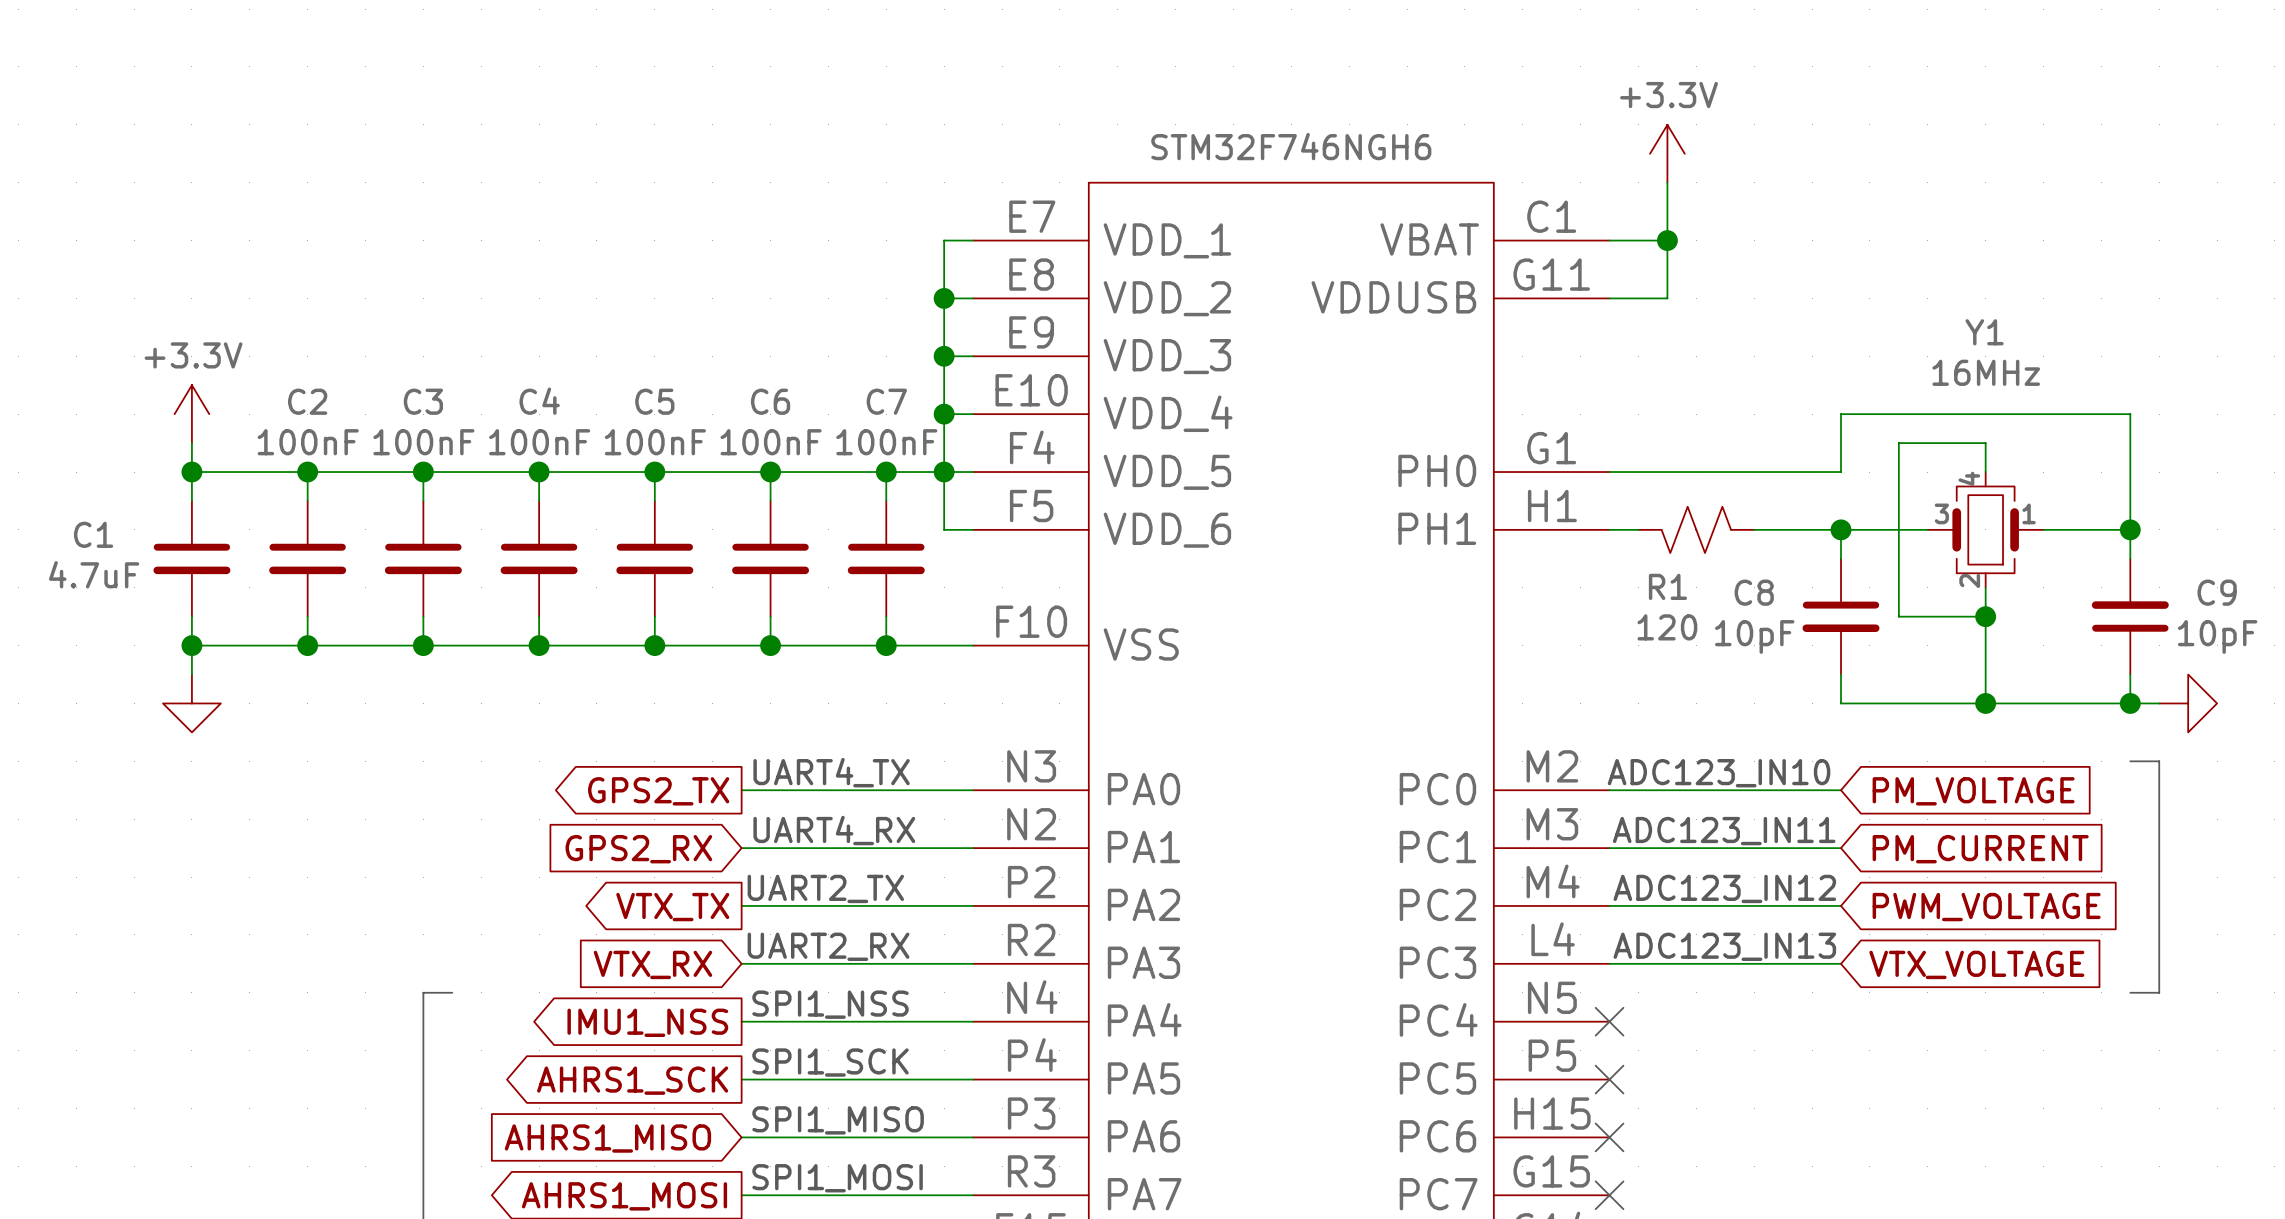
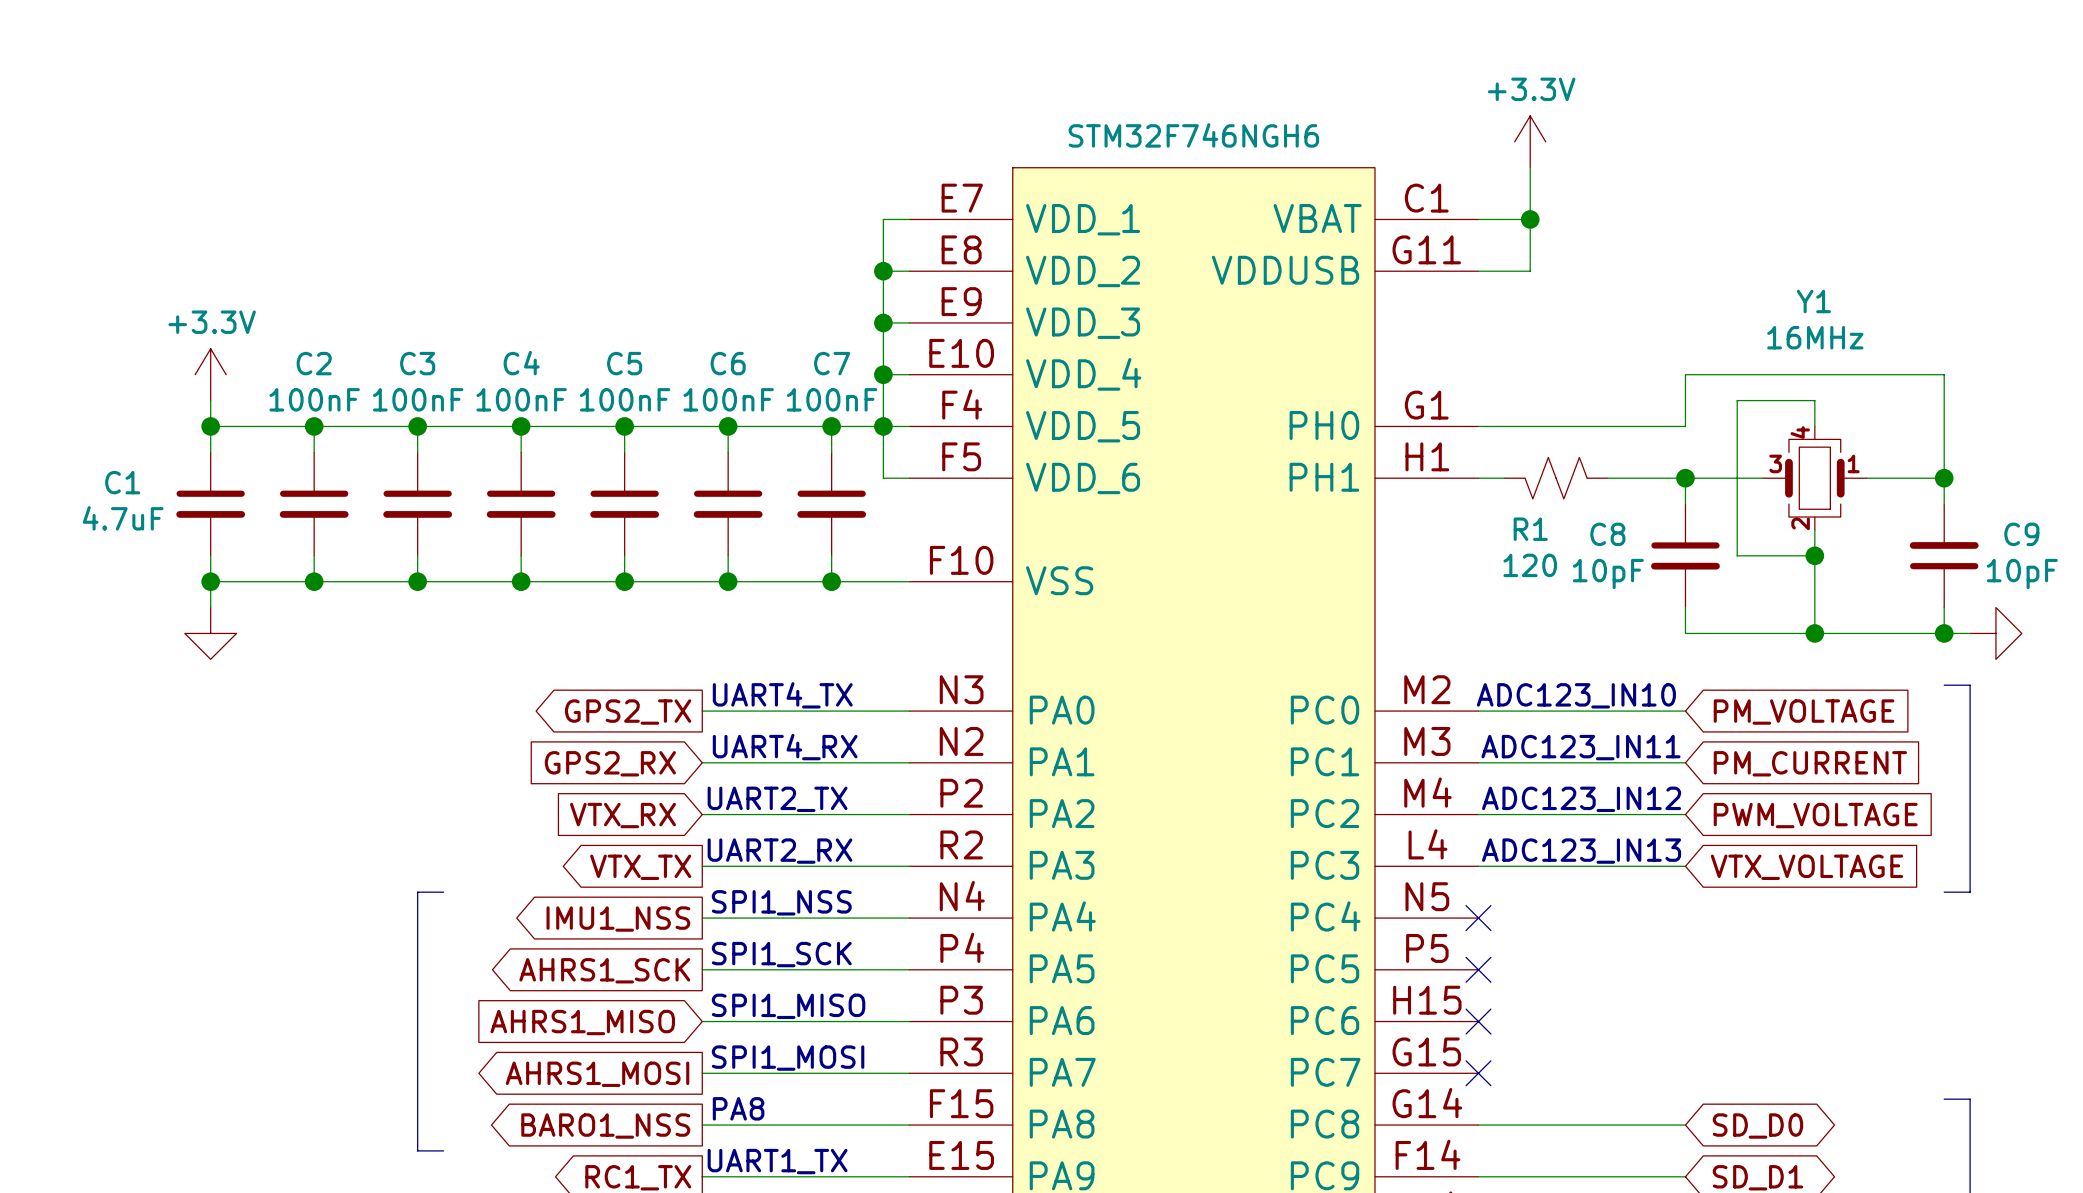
global label shape: output (672, 907) -> input (622, 815)
global label: VTX_TX (672, 907) -> VTX_RX (622, 815)
global label shape: input (652, 964) -> output (640, 867)
global label: VTX_RX (652, 964) -> VTX_TX (640, 867)

